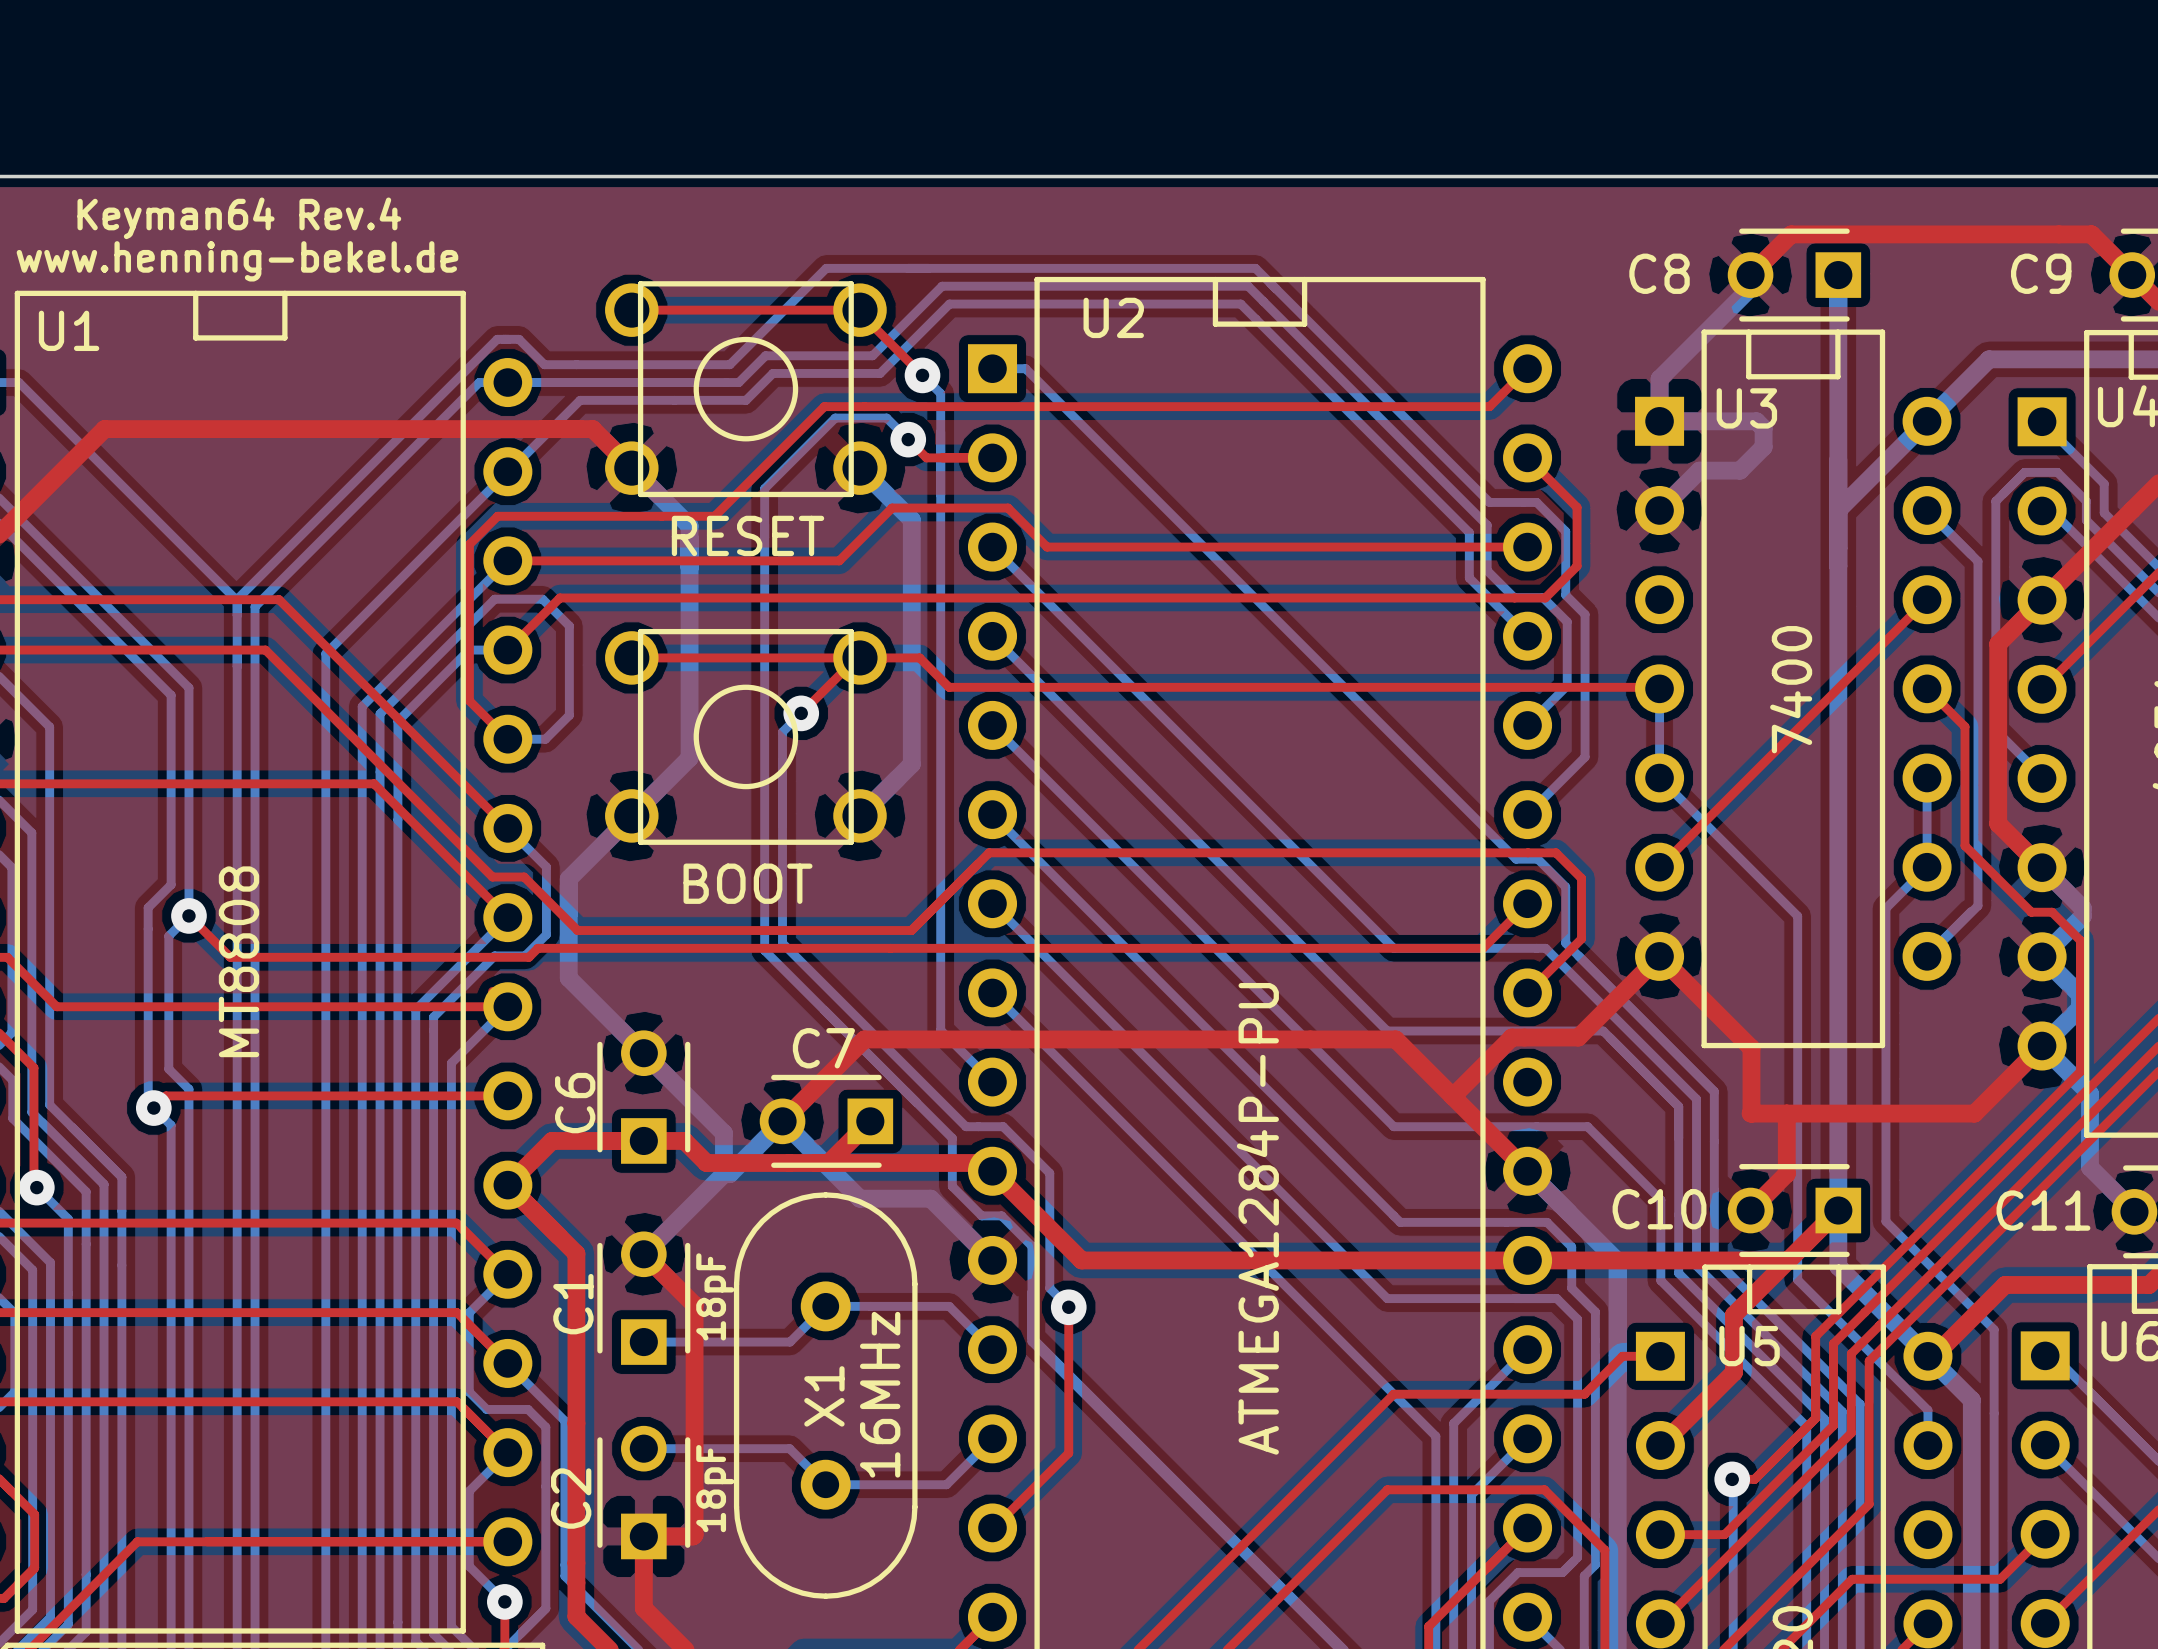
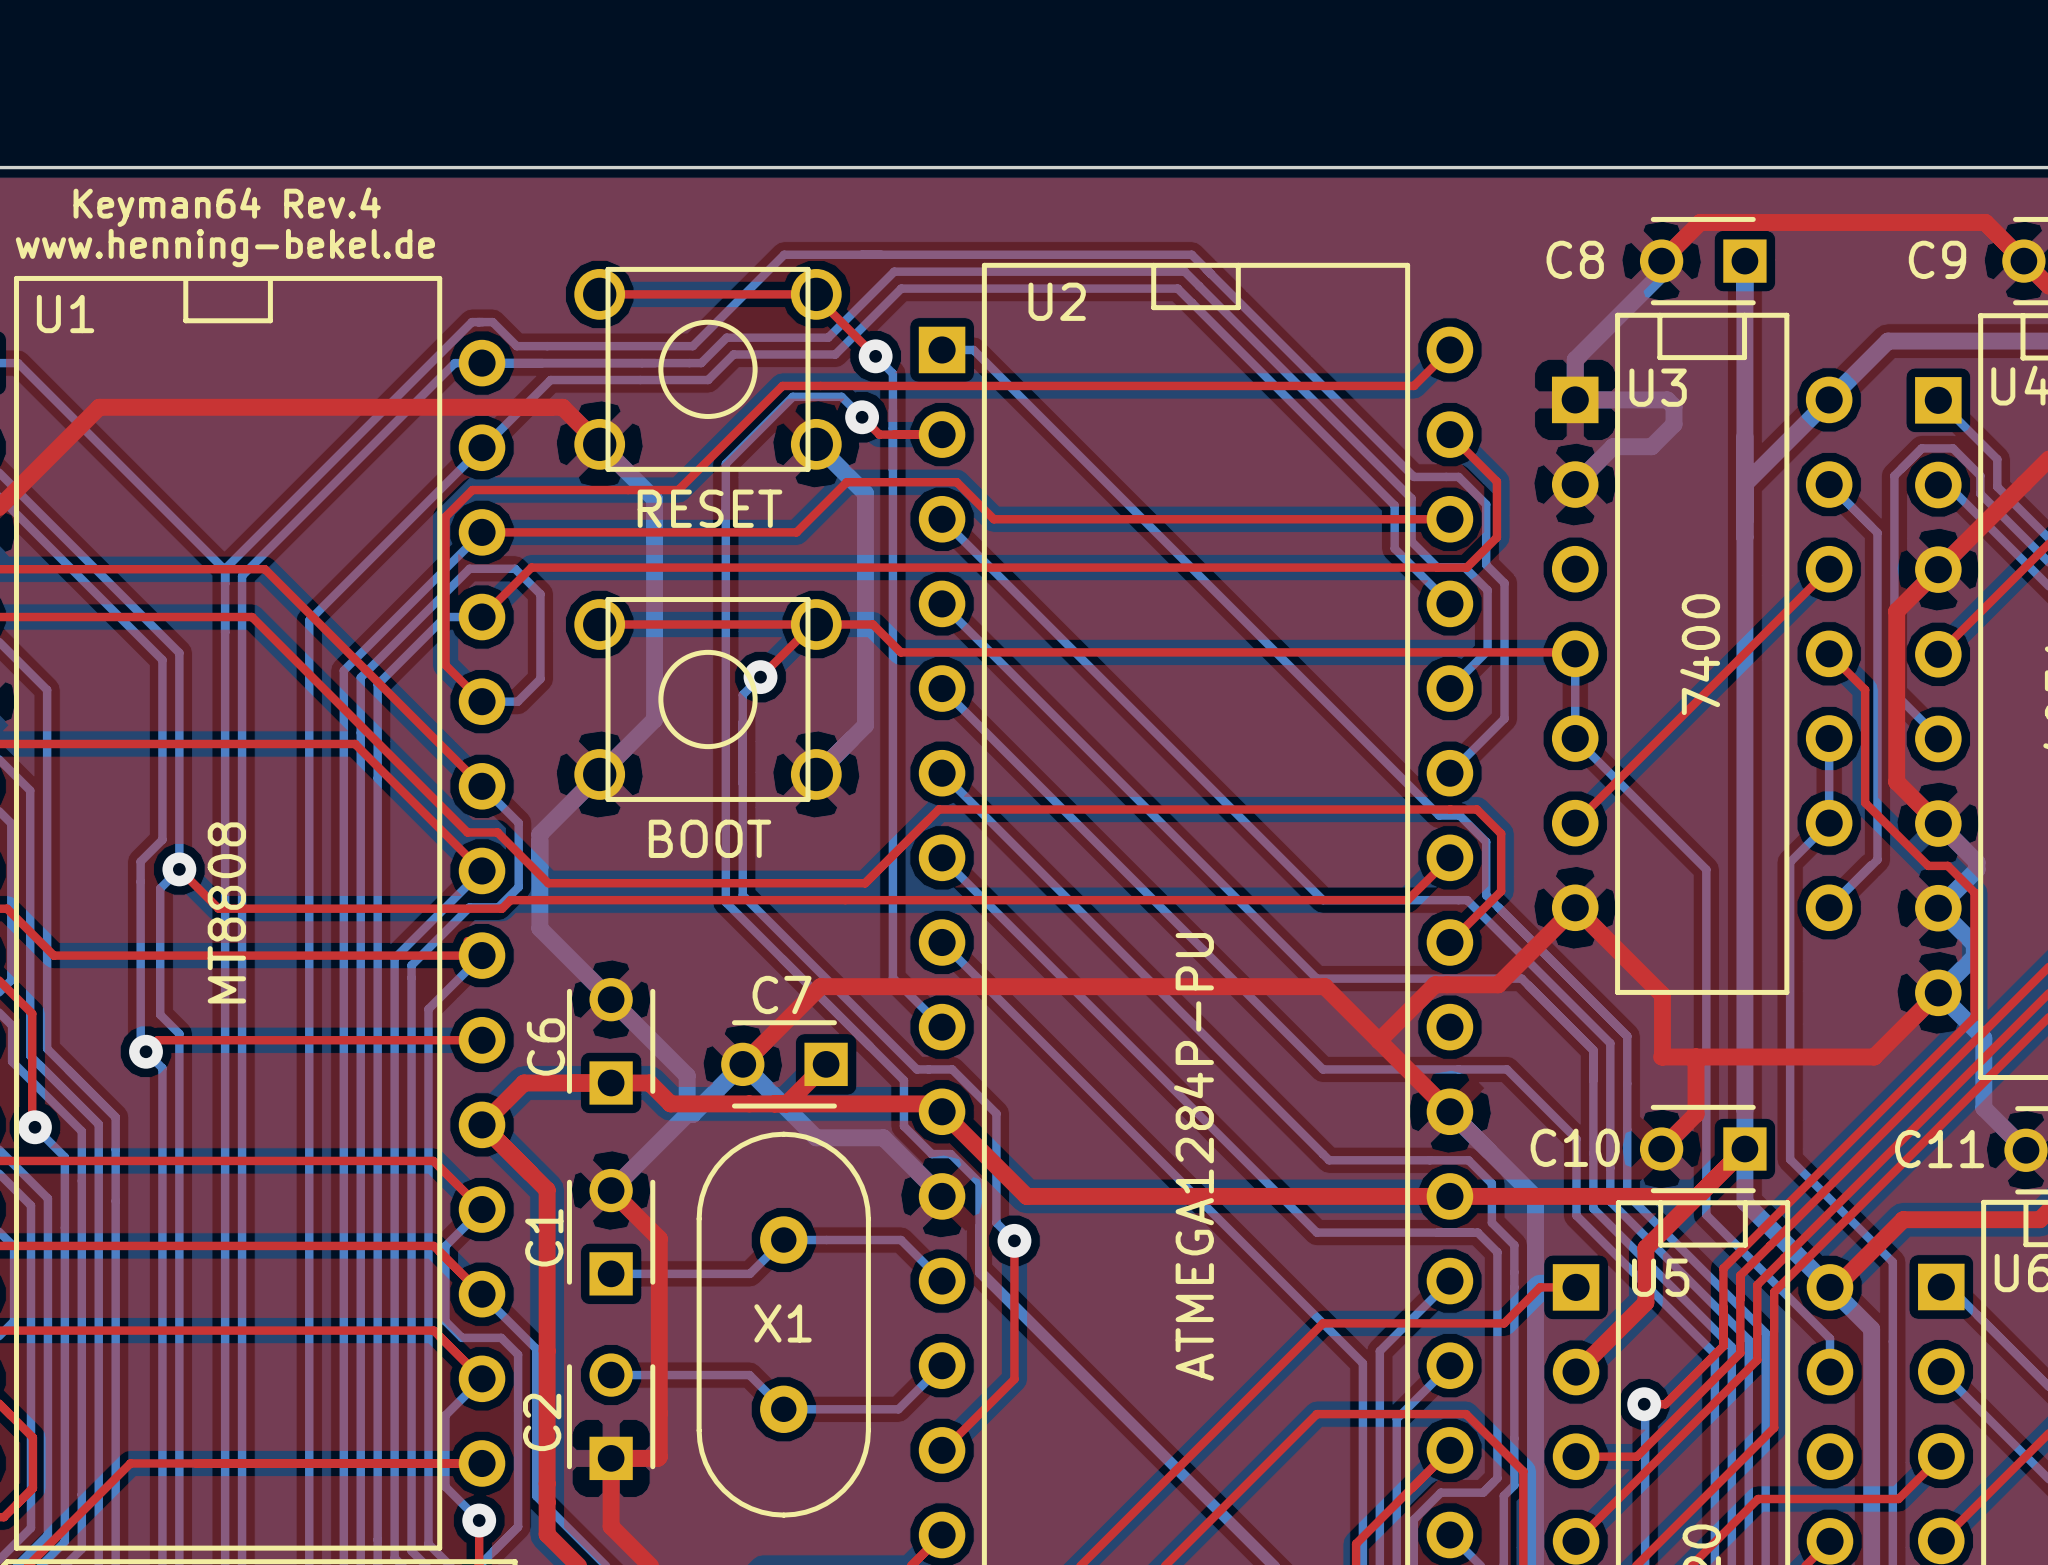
text: 18pF (715, 1296) -> none
X1 value: 16MHz (880, 1394) -> none
X1 name rotation: 0° (824, 1396) -> 90° clockwise (783, 1323)
text: 18pF (715, 1488) -> none

